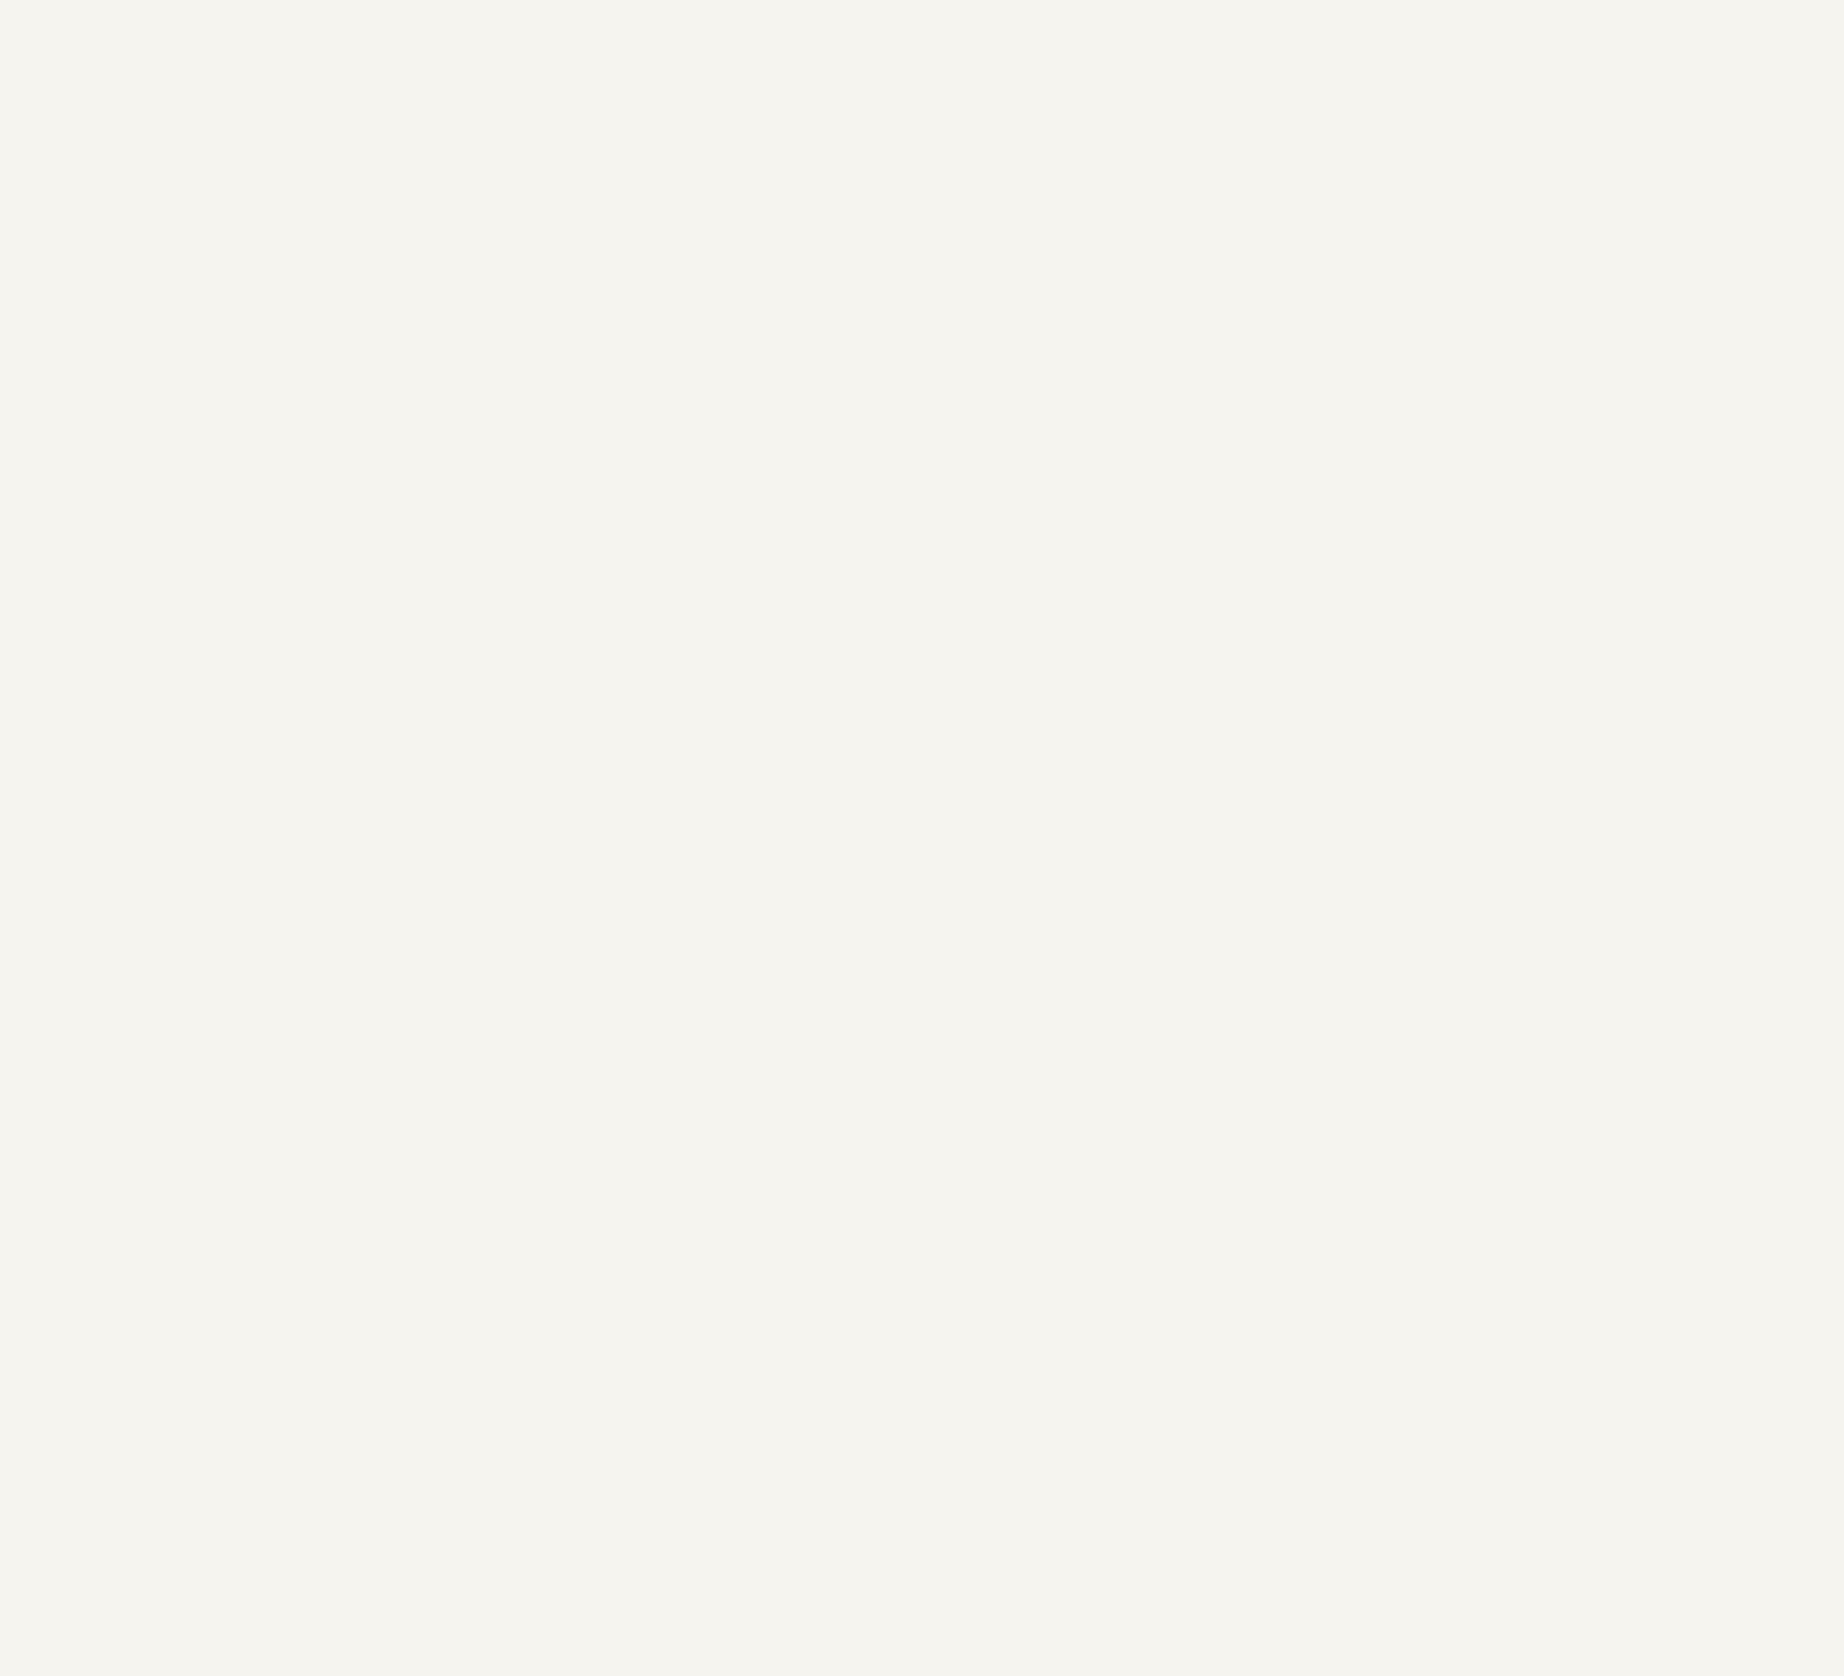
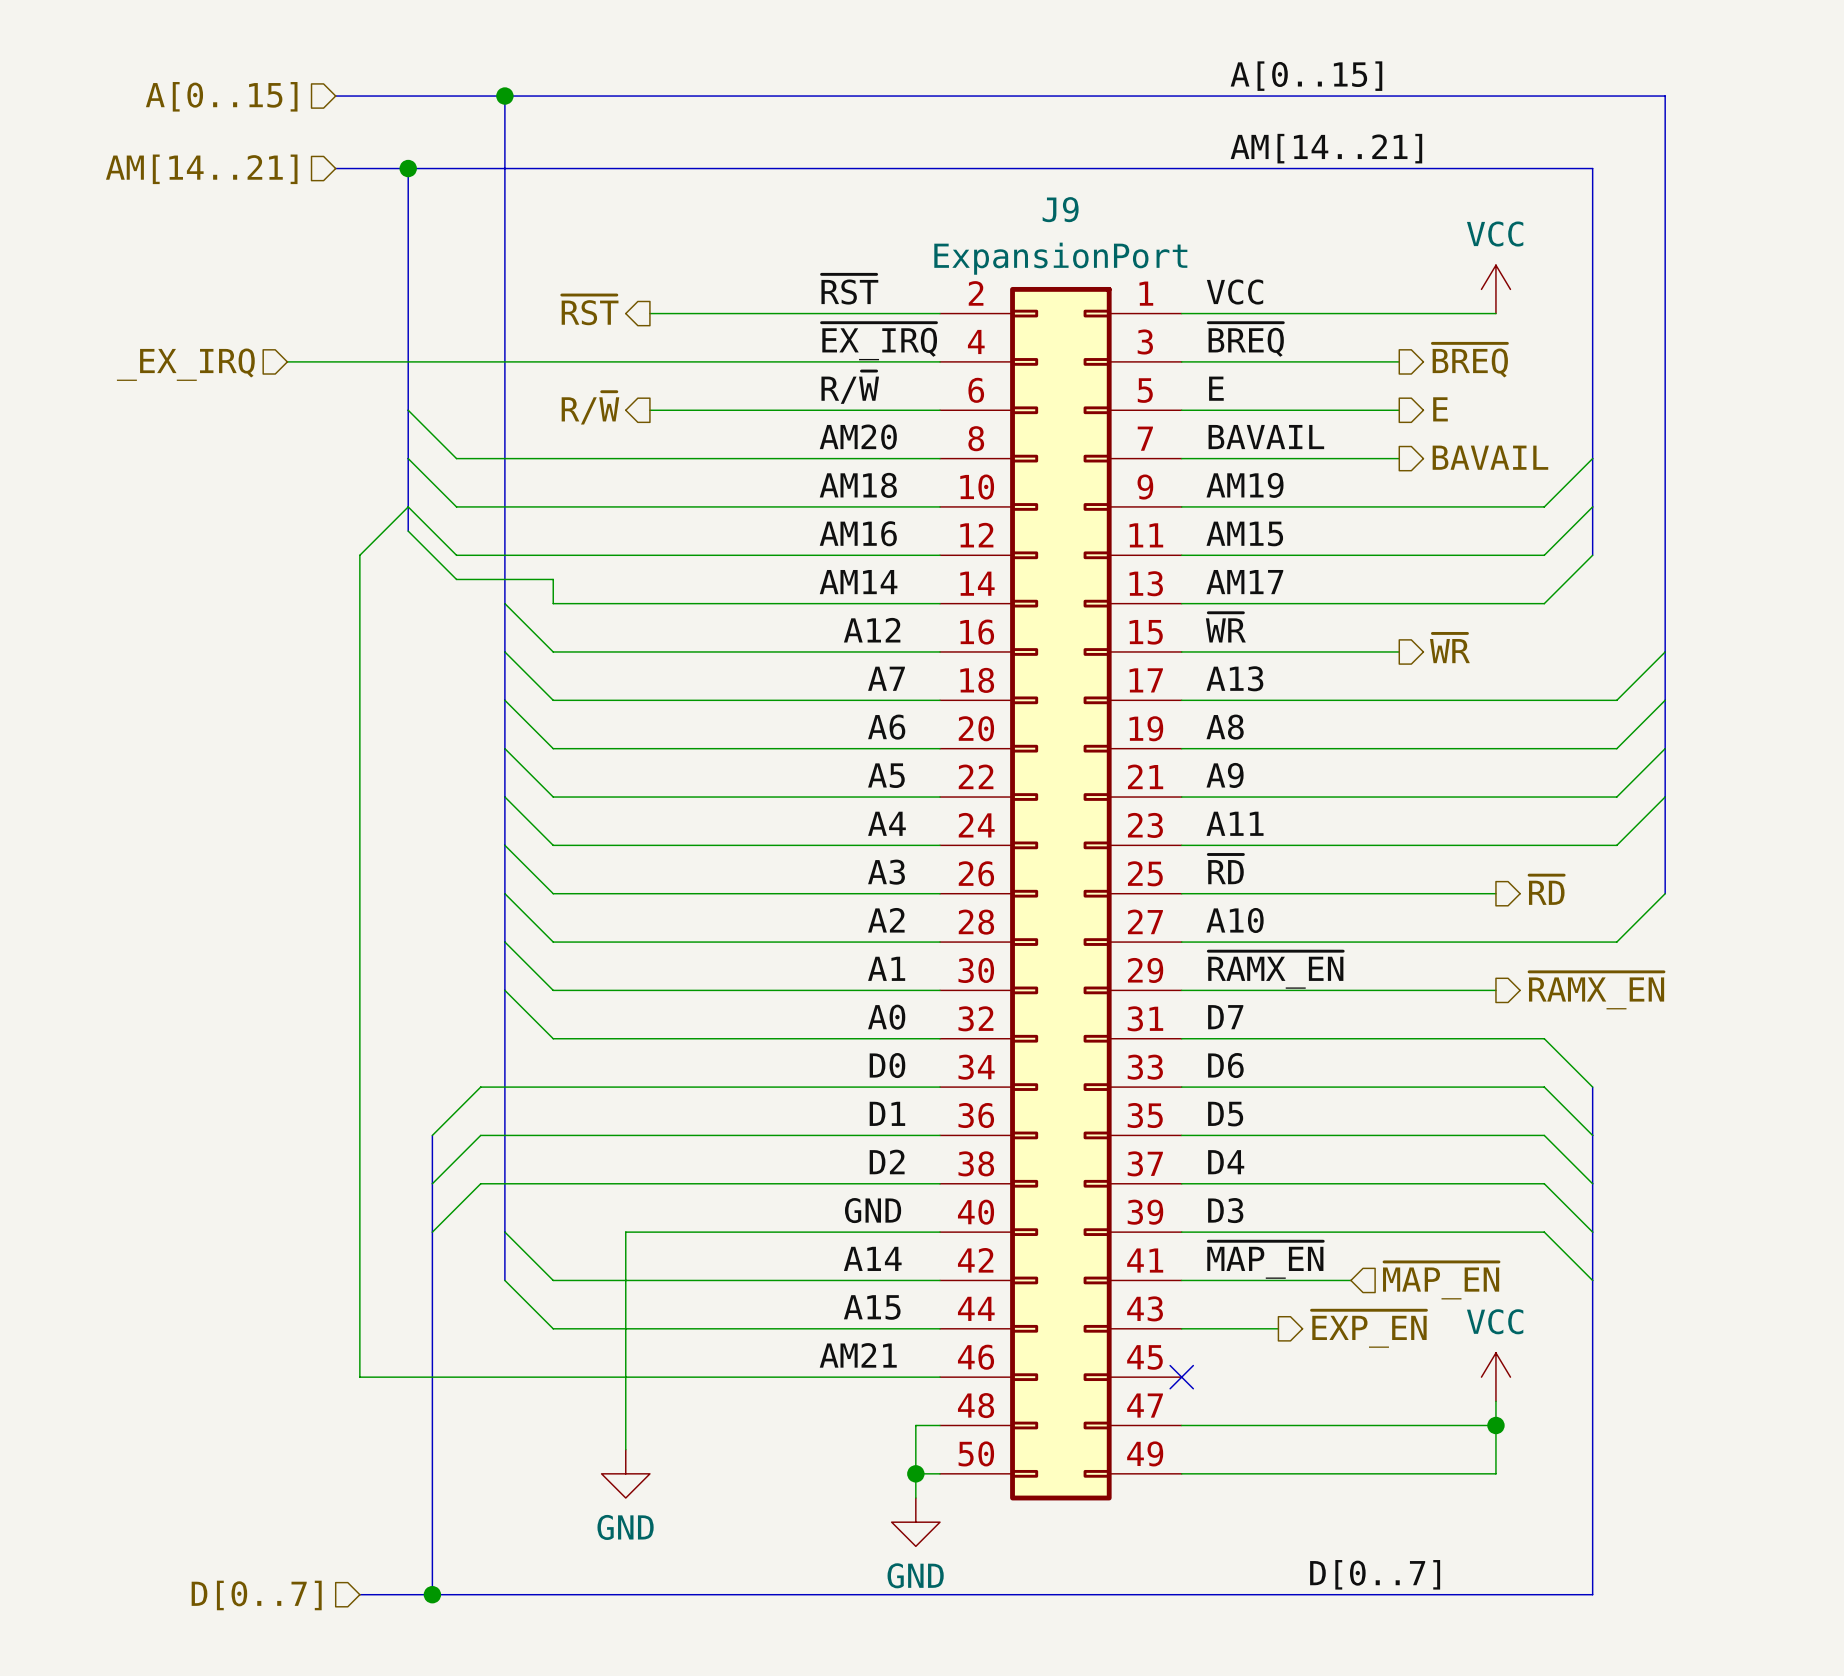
label: none -> A[0..15] (1306, 76)
hierarchical label: none -> A[0..15] (221, 96)
bus: none -> (335, 96) (1665, 96) (1665, 893)
bus: none -> (504, 96) (504, 1280)
junction: none -> (504, 96)
label: none -> AM[14..21] (1326, 148)
bus: none -> (335, 168) (1592, 168) (1592, 555)
bus: none -> (408, 168) (408, 531)
junction: none -> (408, 168)
hierarchical label: none -> AM[14..21] (201, 169)
label: none -> ~{RST} (849, 289)
power symbol: none -> VCC (1495, 289)
label: none -> VCC (1235, 292)
hierarchical label: none -> ~{RST} (590, 310)
wire: none -> (649, 313) (940, 313)
wire: none -> (1181, 313) (1495, 313)
label: none -> ~{BREQ} (1246, 339)
label: none -> ~{EX_IRQ} (879, 341)
hierarchical label: none -> ~{BREQ} (1470, 360)
wire: none -> (287, 361) (940, 361)
wire: none -> (1181, 361) (1399, 361)
hierarchical label: none -> _EX_IRQ (185, 364)
label: none -> R/~{W} (850, 387)
label: none -> E (1216, 388)
hierarchical label: none -> R/~{W} (590, 408)
hierarchical label: none -> E (1440, 409)
wire: none -> (408, 410) (456, 458) (940, 458)
wire: none -> (649, 410) (940, 410)
wire: none -> (1181, 410) (1399, 410)
label: none -> AM20 (858, 437)
label: none -> BAVAIL (1266, 437)
hierarchical label: none -> BAVAIL (1490, 457)
wire: none -> (408, 458) (456, 506) (940, 506)
wire: none -> (1181, 458) (1399, 458)
wire: none -> (1592, 458) (1544, 506) (1181, 506)
label: none -> AM18 (858, 485)
label: none -> AM19 (1244, 485)
wire: none -> (1592, 506) (1544, 555) (1181, 555)
wire: none -> (408, 531) (456, 579) (553, 579) (553, 603) (940, 603)
label: none -> AM16 (858, 533)
label: none -> AM15 (1244, 533)
wire: none -> (940, 555) (456, 555) (408, 506) (359, 555) (359, 1377) (940, 1377)
wire: none -> (1592, 555) (1544, 603) (1181, 603)
label: none -> AM14 (858, 582)
label: none -> AM17 (1244, 582)
wire: none -> (504, 603) (553, 651) (940, 651)
label: none -> ~{WR} (1225, 627)
label: none -> A12 (872, 630)
hierarchical label: none -> ~{WR} (1449, 648)
wire: none -> (504, 651) (553, 700) (940, 700)
wire: none -> (1181, 651) (1399, 651)
wire: none -> (1665, 651) (1616, 700) (1181, 700)
label: none -> A7 (886, 678)
label: none -> A13 (1234, 678)
wire: none -> (504, 700) (553, 748) (940, 748)
wire: none -> (1665, 700) (1616, 748) (1181, 748)
label: none -> A6 (886, 727)
label: none -> A8 (1225, 727)
wire: none -> (504, 748) (553, 797) (940, 797)
wire: none -> (1665, 748) (1616, 797) (1181, 797)
label: none -> A5 (886, 775)
label: none -> A9 (1225, 775)
wire: none -> (504, 797) (553, 845) (940, 845)
wire: none -> (1665, 797) (1616, 845) (1181, 845)
label: none -> A4 (886, 823)
label: none -> A11 (1235, 823)
wire: none -> (504, 845) (553, 893) (940, 893)
label: none -> ~{RD} (1225, 869)
label: none -> A3 (886, 872)
hierarchical label: none -> ~{RD} (1546, 890)
wire: none -> (504, 893) (553, 942) (940, 942)
J9: none -> ExpansionPort (1060, 893)
wire: none -> (1181, 893) (1495, 893)
wire: none -> (1665, 893) (1616, 942) (1181, 942)
label: none -> A2 (886, 920)
label: none -> A10 (1235, 920)
wire: none -> (504, 942) (553, 990) (940, 990)
label: none -> A1 (886, 968)
label: none -> ~{RAMX_EN} (1275, 969)
wire: none -> (504, 990) (553, 1038) (940, 1038)
wire: none -> (1181, 990) (1495, 990)
hierarchical label: none -> ~{RAMX_EN} (1596, 990)
label: none -> A0 (886, 1017)
label: none -> D7 (1225, 1017)
wire: none -> (1181, 1038) (1544, 1038) (1592, 1087)
label: none -> D0 (887, 1065)
label: none -> D6 (1225, 1065)
wire: none -> (940, 1087) (480, 1087) (432, 1135)
wire: none -> (1181, 1087) (1544, 1087) (1592, 1135)
bus: none -> (1592, 1087) (1592, 1594) (359, 1594)
label: none -> D1 (887, 1113)
label: none -> D5 (1225, 1114)
bus: none -> (432, 1135) (432, 1594)
wire: none -> (940, 1135) (480, 1135) (432, 1183)
wire: none -> (1181, 1135) (1544, 1135) (1592, 1183)
label: none -> D2 (887, 1161)
label: none -> D4 (1226, 1162)
wire: none -> (940, 1183) (480, 1183) (432, 1232)
wire: none -> (1181, 1183) (1544, 1183) (1592, 1232)
label: none -> GND (873, 1210)
label: none -> D3 (1225, 1210)
wire: none -> (504, 1232) (553, 1280) (940, 1280)
wire: none -> (940, 1232) (625, 1232) (625, 1449)
wire: none -> (1181, 1232) (1544, 1232) (1592, 1280)
label: none -> A14 (872, 1258)
label: none -> ~{MAP_EN} (1265, 1260)
wire: none -> (504, 1280) (553, 1328) (940, 1328)
wire: none -> (1181, 1280) (1350, 1280)
hierarchical label: none -> ~{MAP_EN} (1441, 1280)
label: none -> A15 (872, 1307)
wire: none -> (1181, 1328) (1278, 1328)
hierarchical label: none -> ~{EXP_EN} (1369, 1329)
label: none -> AM21 (858, 1355)
no-connect mark: none -> (1181, 1377)
power symbol: none -> VCC (1495, 1377)
wire: none -> (1495, 1401) (1495, 1473) (1181, 1473)
wire: none -> (940, 1425) (915, 1425) (915, 1498)
wire: none -> (1181, 1425) (1495, 1425)
junction: none -> (1495, 1425)
power symbol: none -> GND (625, 1473)
wire: none -> (915, 1473) (940, 1473)
junction: none -> (915, 1473)
power symbol: none -> GND (915, 1522)
label: none -> D[0..7] (1375, 1574)
junction: none -> (432, 1594)
hierarchical label: none -> D[0..7] (256, 1595)

